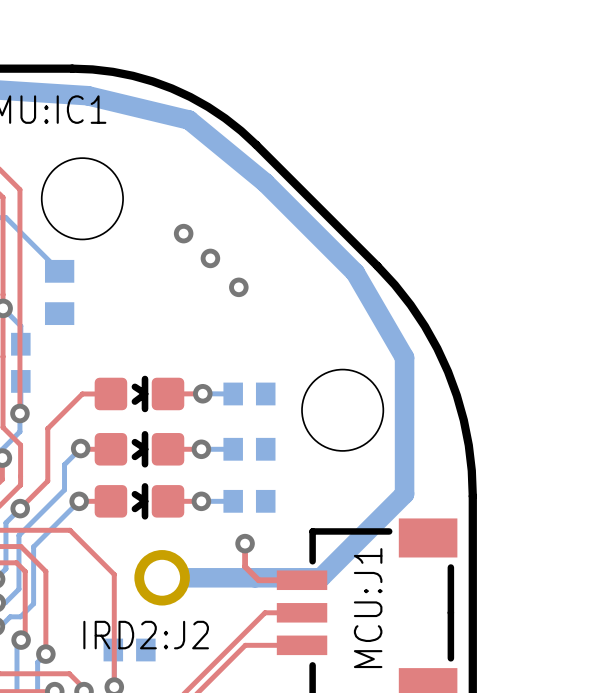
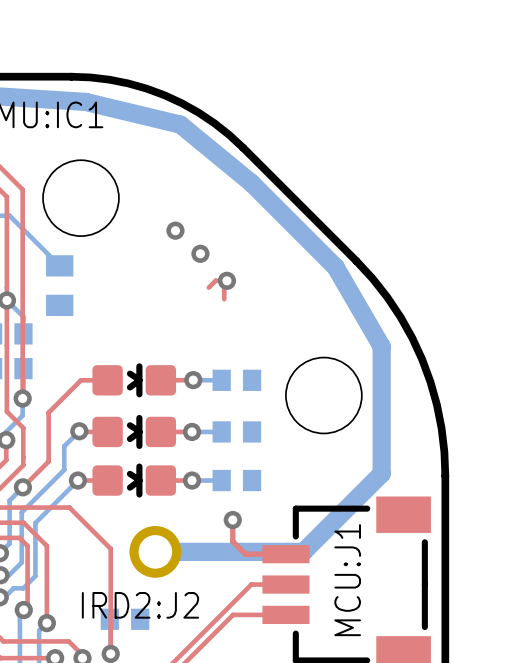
top track: none -> (208, 287) (215, 280) (226, 280) (224, 283) (224, 299)

